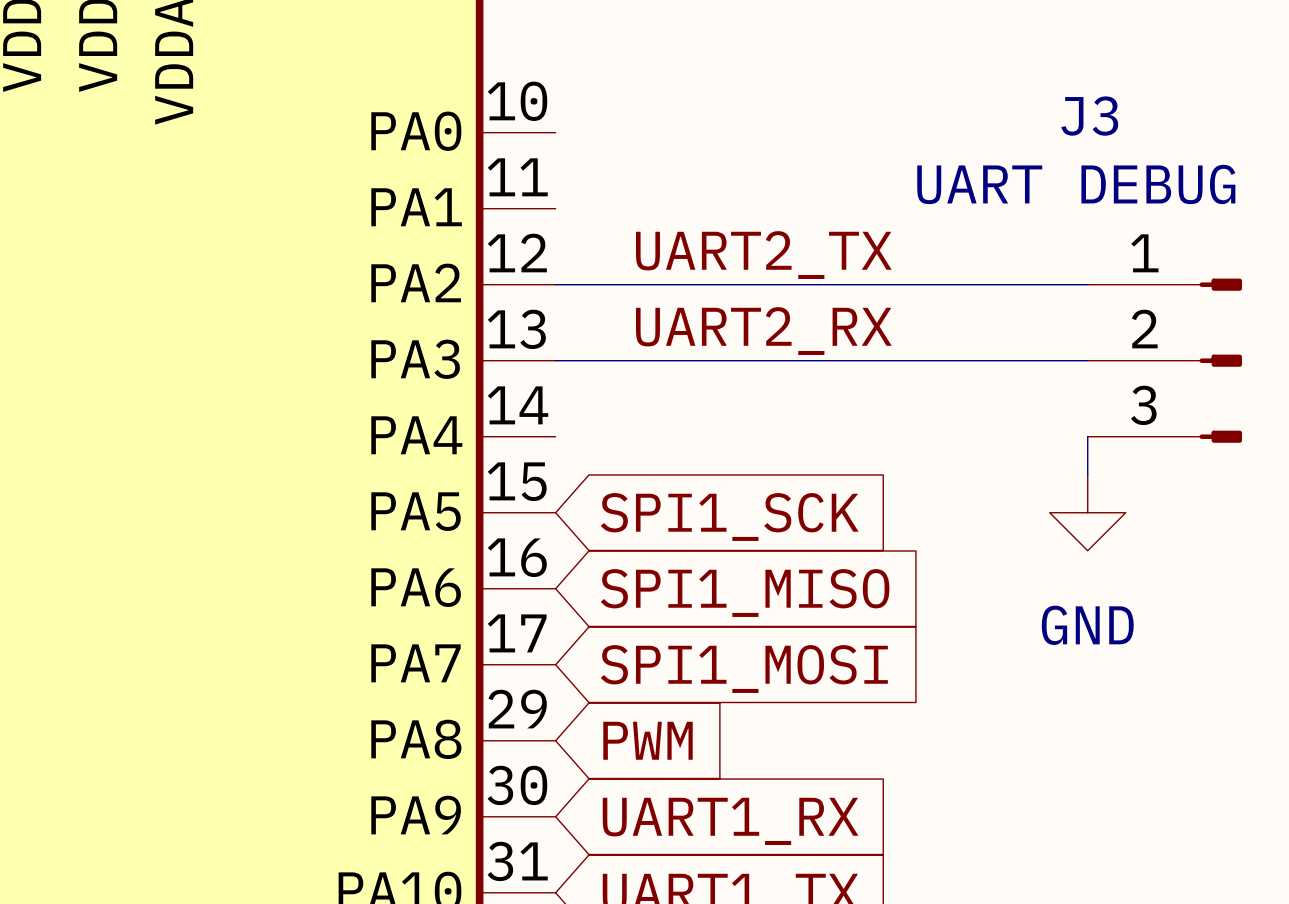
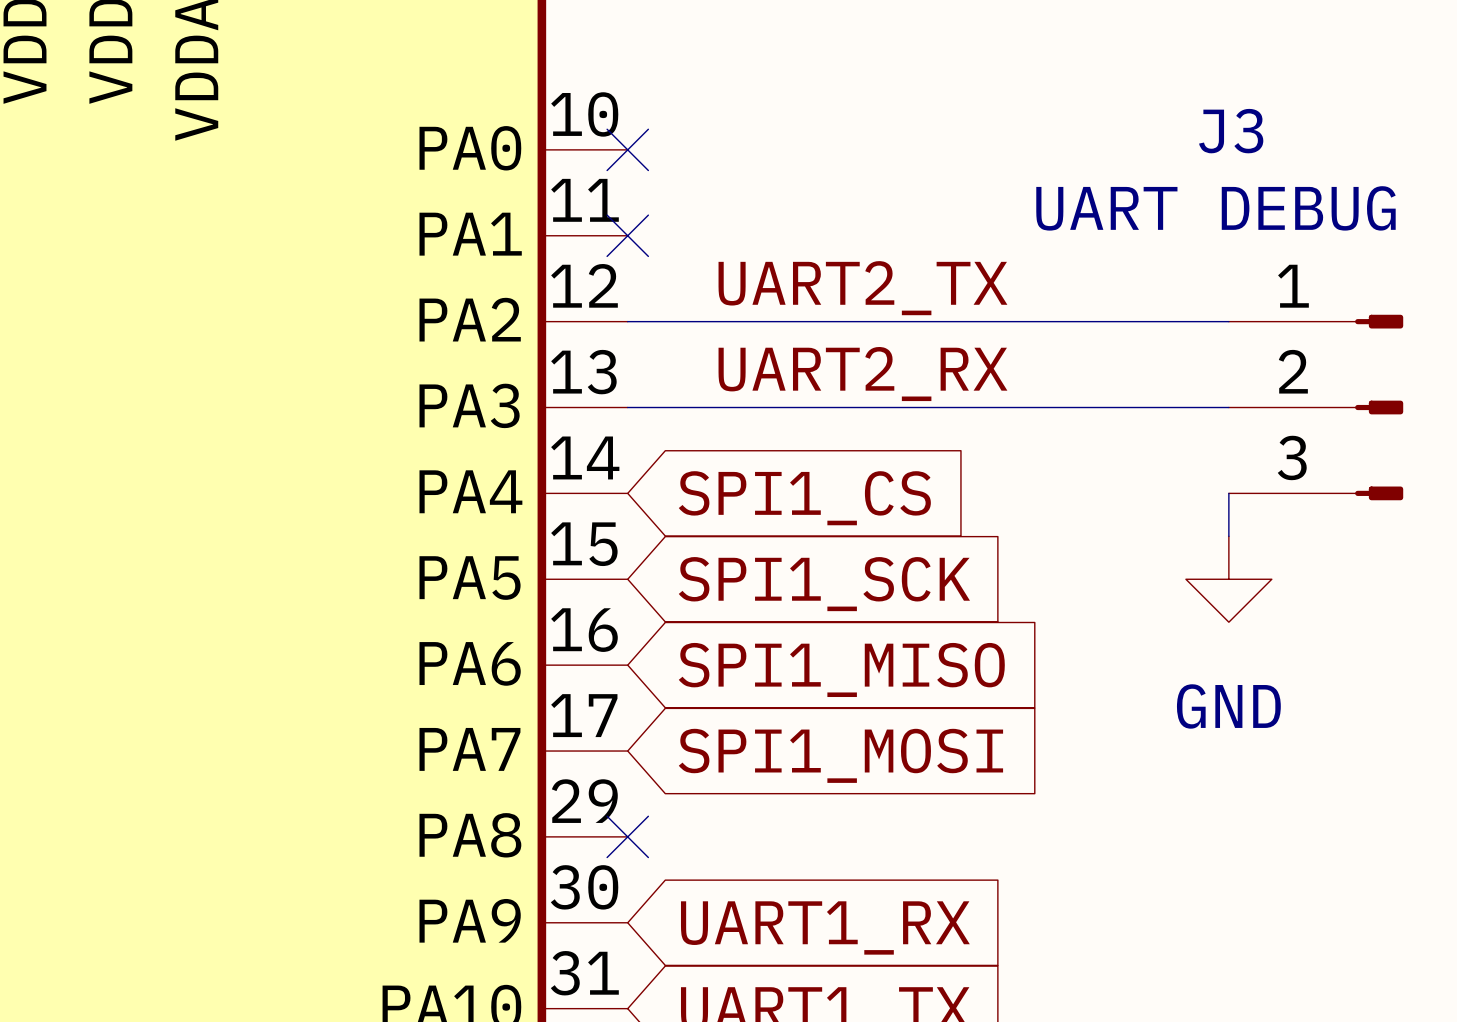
no-connect mark: none -> (627, 149)
no-connect mark: none -> (627, 235)
global label: none -> SPI1_CS (804, 498)
no-connect mark: none -> (627, 836)
global label: PWM (648, 740) -> none

